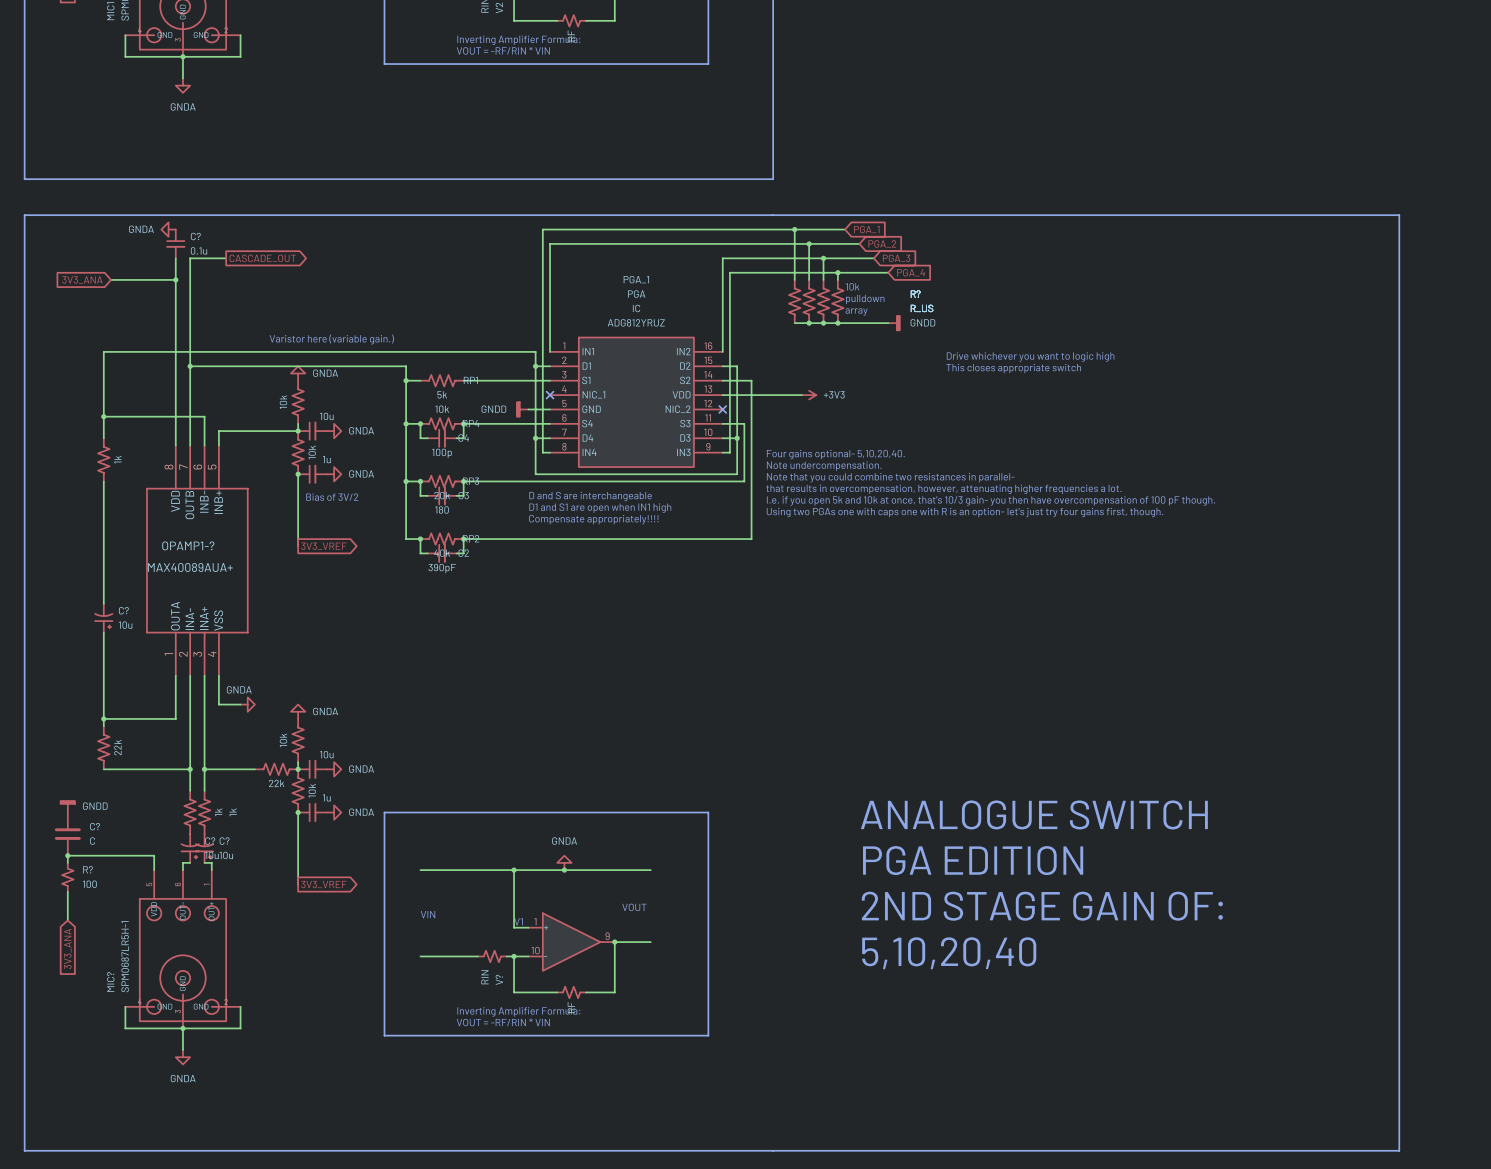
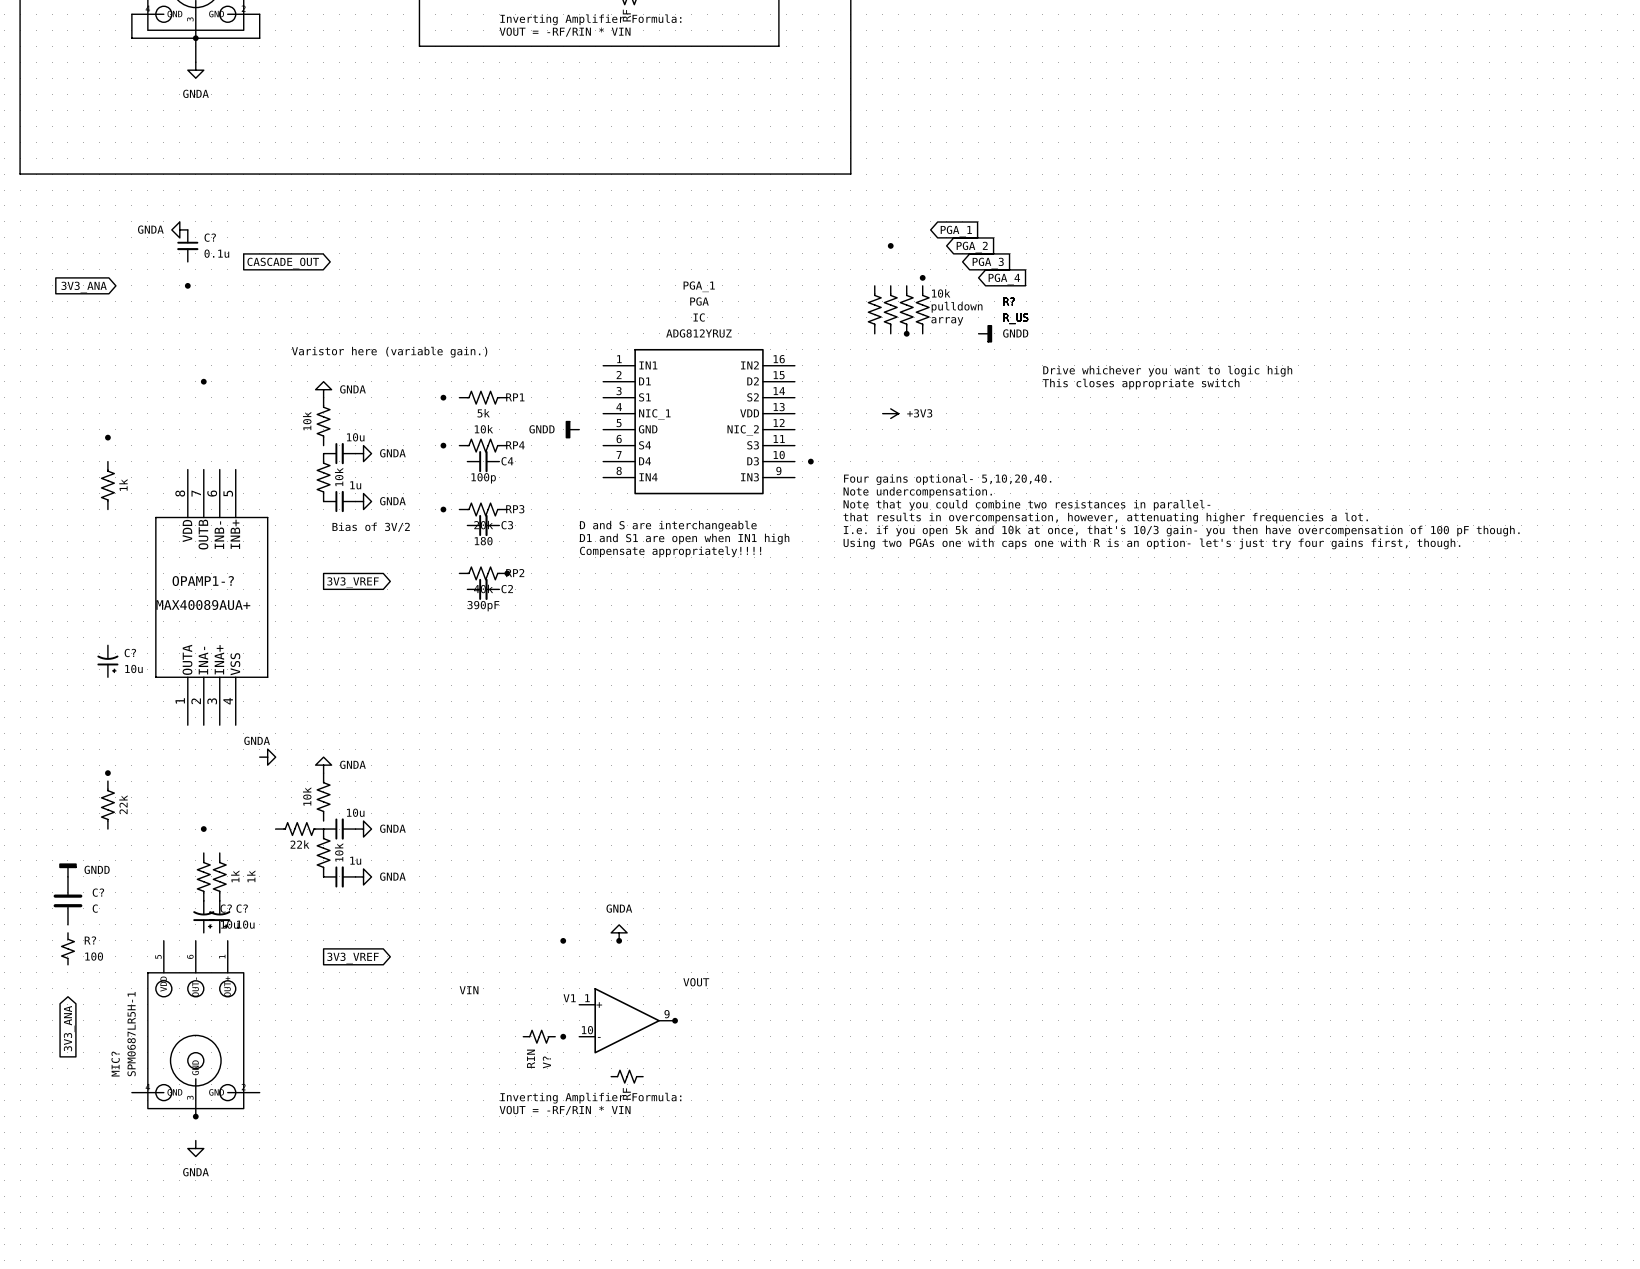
line: (24, 215) (1399, 215) (1399, 1150) (24, 1150) (24, 215) -> none
wire: (794, 229) (794, 279) -> none
junction: (794, 229) -> none
wire: (845, 229) (542, 229) (542, 452) (550, 452) -> none
wire: (809, 243) (809, 279) -> none
wire: (859, 243) (550, 243) (550, 351) -> none
wire: (175, 258) (175, 445) -> none
wire: (226, 258) (190, 258) (190, 445) -> none
wire: (823, 258) (823, 279) -> none
junction: (823, 258) -> none
wire: (873, 258) (722, 258) (722, 351) -> none
wire: (837, 272) (837, 279) -> none
wire: (888, 272) (729, 272) (729, 452) (722, 452) -> none
wire: (111, 279) (175, 279) -> none
wire: (794, 323) (888, 323) -> none
junction: (809, 323) -> none
junction: (837, 323) -> none
wire: (190, 366) (406, 366) (406, 539) (420, 539) (420, 553) (427, 553) -> none
wire: (535, 366) (550, 366) -> none
junction: (535, 366) -> none
wire: (722, 366) (737, 366) (737, 474) (535, 474) (535, 351) (103, 351) (103, 438) -> none
wire: (406, 380) (420, 380) -> none
wire: (463, 380) (550, 380) -> none
wire: (722, 380) (751, 380) (751, 539) (463, 539) (463, 553) (456, 553) -> none
no-connect mark: (550, 395) -> none
wire: (722, 395) (801, 395) -> none
wire: (528, 409) (550, 409) -> none
no-connect mark: (722, 409) -> none
wire: (103, 416) (204, 416) (204, 445) -> none
wire: (298, 423) (298, 431) (218, 431) (218, 445) -> none
wire: (406, 423) (420, 423) (420, 438) (427, 438) -> none
junction: (420, 423) -> none
junction: (463, 423) -> none
wire: (550, 423) (463, 423) (463, 438) (456, 438) -> none
wire: (722, 423) (744, 423) (744, 481) (463, 481) (463, 495) (456, 495) -> none
junction: (298, 431) -> none
wire: (535, 438) (550, 438) -> none
junction: (535, 438) -> none
wire: (722, 438) (737, 438) -> none
wire: (298, 474) (298, 546) -> none
junction: (298, 474) -> none
wire: (103, 481) (103, 603) -> none
wire: (406, 481) (420, 481) (420, 495) (427, 495) -> none
junction: (420, 481) -> none
junction: (463, 481) -> none
junction: (420, 539) -> none
wire: (103, 632) (103, 726) -> none
wire: (175, 675) (175, 718) (103, 718) -> none
wire: (190, 675) (190, 790) -> none
wire: (204, 675) (204, 790) -> none
wire: (218, 675) (218, 704) (240, 704) -> none
wire: (298, 762) (298, 769) -> none
wire: (103, 769) (190, 769) -> none
wire: (204, 769) (254, 769) -> none
junction: (204, 769) -> none
junction: (298, 769) -> none
wire: (298, 812) (298, 884) -> none
junction: (298, 812) -> none
line: (384, 812) (708, 812) (708, 1035) (384, 1035) (384, 812) -> none
text: ANALOGUE SWITCH (1034, 814) -> none
junction: (67, 855) -> none
text: PGA EDITION (973, 860) -> none
wire: (67, 862) (67, 855) (154, 855) (154, 870) -> none
wire: (190, 862) (182, 862) (182, 870) -> none
wire: (204, 862) (211, 862) (211, 870) -> none
wire: (420, 870) (650, 870) -> none
wire: (514, 870) (514, 927) (528, 927) -> none
wire: (67, 891) (67, 920) -> none
text: 2ND STAGE GAIN OF: (1042, 906) -> none
wire: (650, 942) (614, 942) (614, 992) (586, 992) -> none
text: 5,10,20,40 (949, 953) -> none
wire: (420, 956) (478, 956) -> none
wire: (506, 956) (528, 956) -> none
wire: (514, 956) (514, 992) (557, 992) -> none
wire: (125, 1006) (125, 1028) (240, 1028) (240, 1006) -> none
wire: (182, 1028) (182, 1050) -> none

